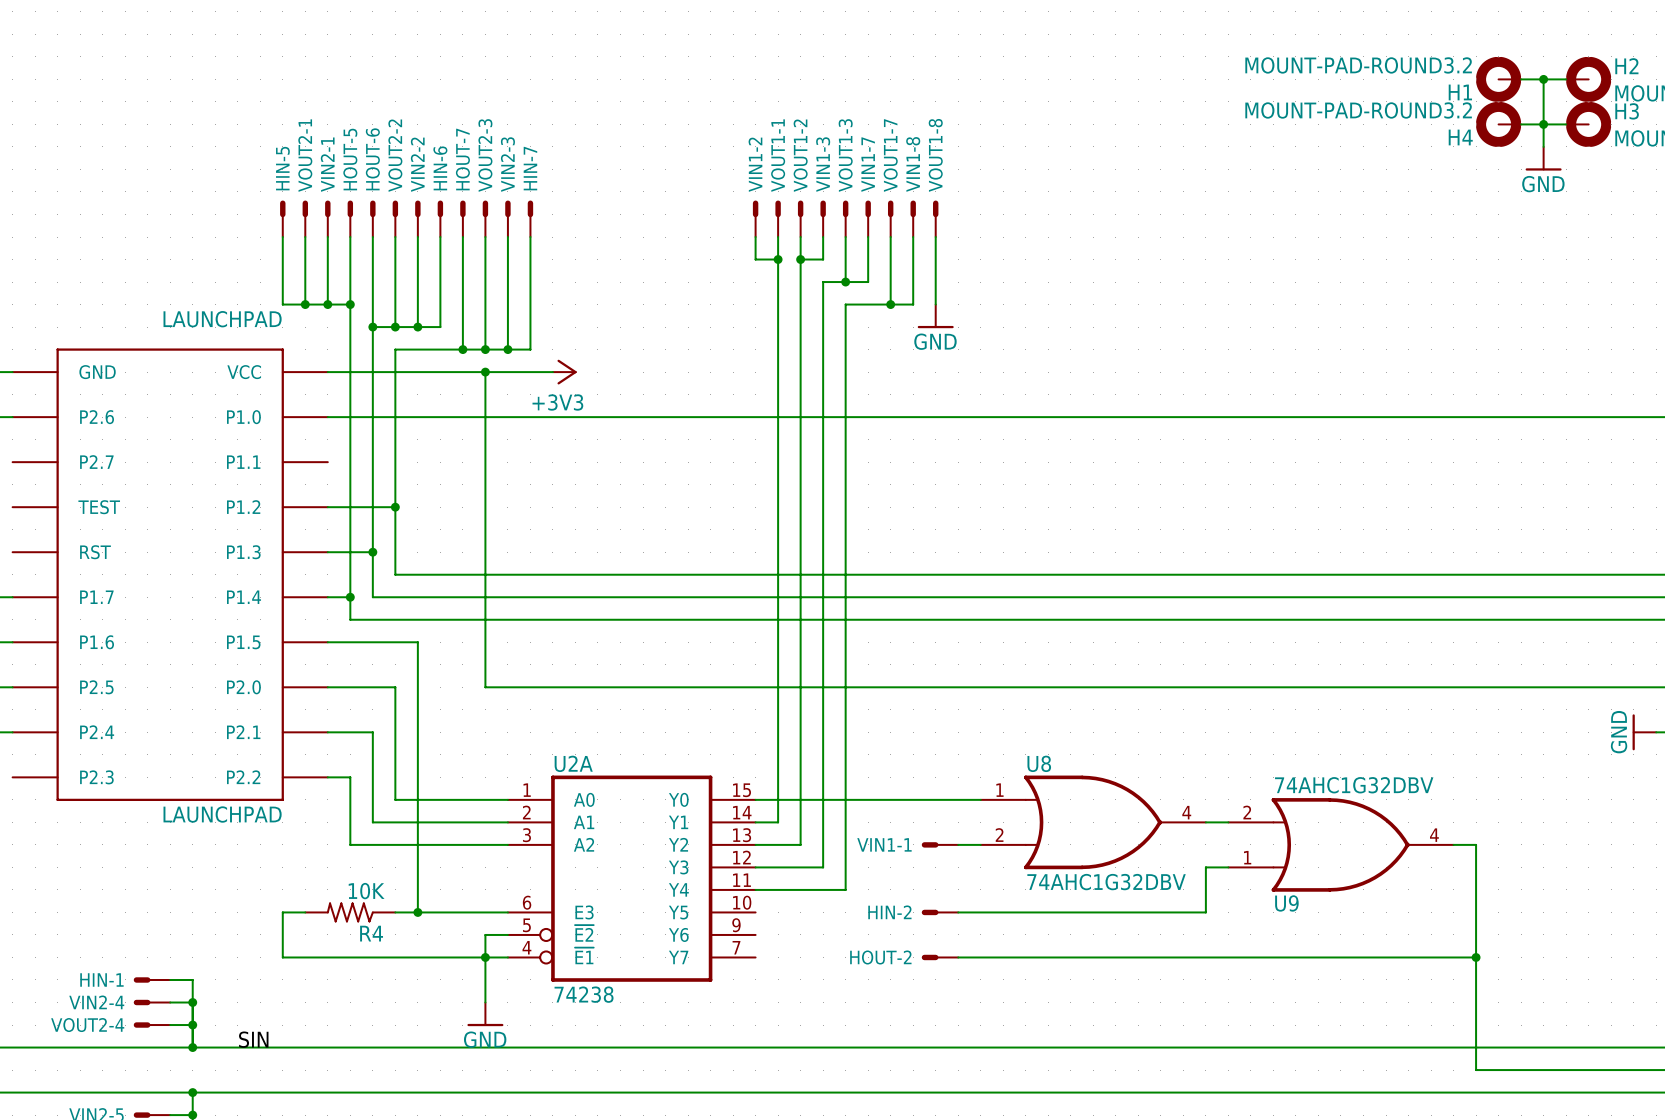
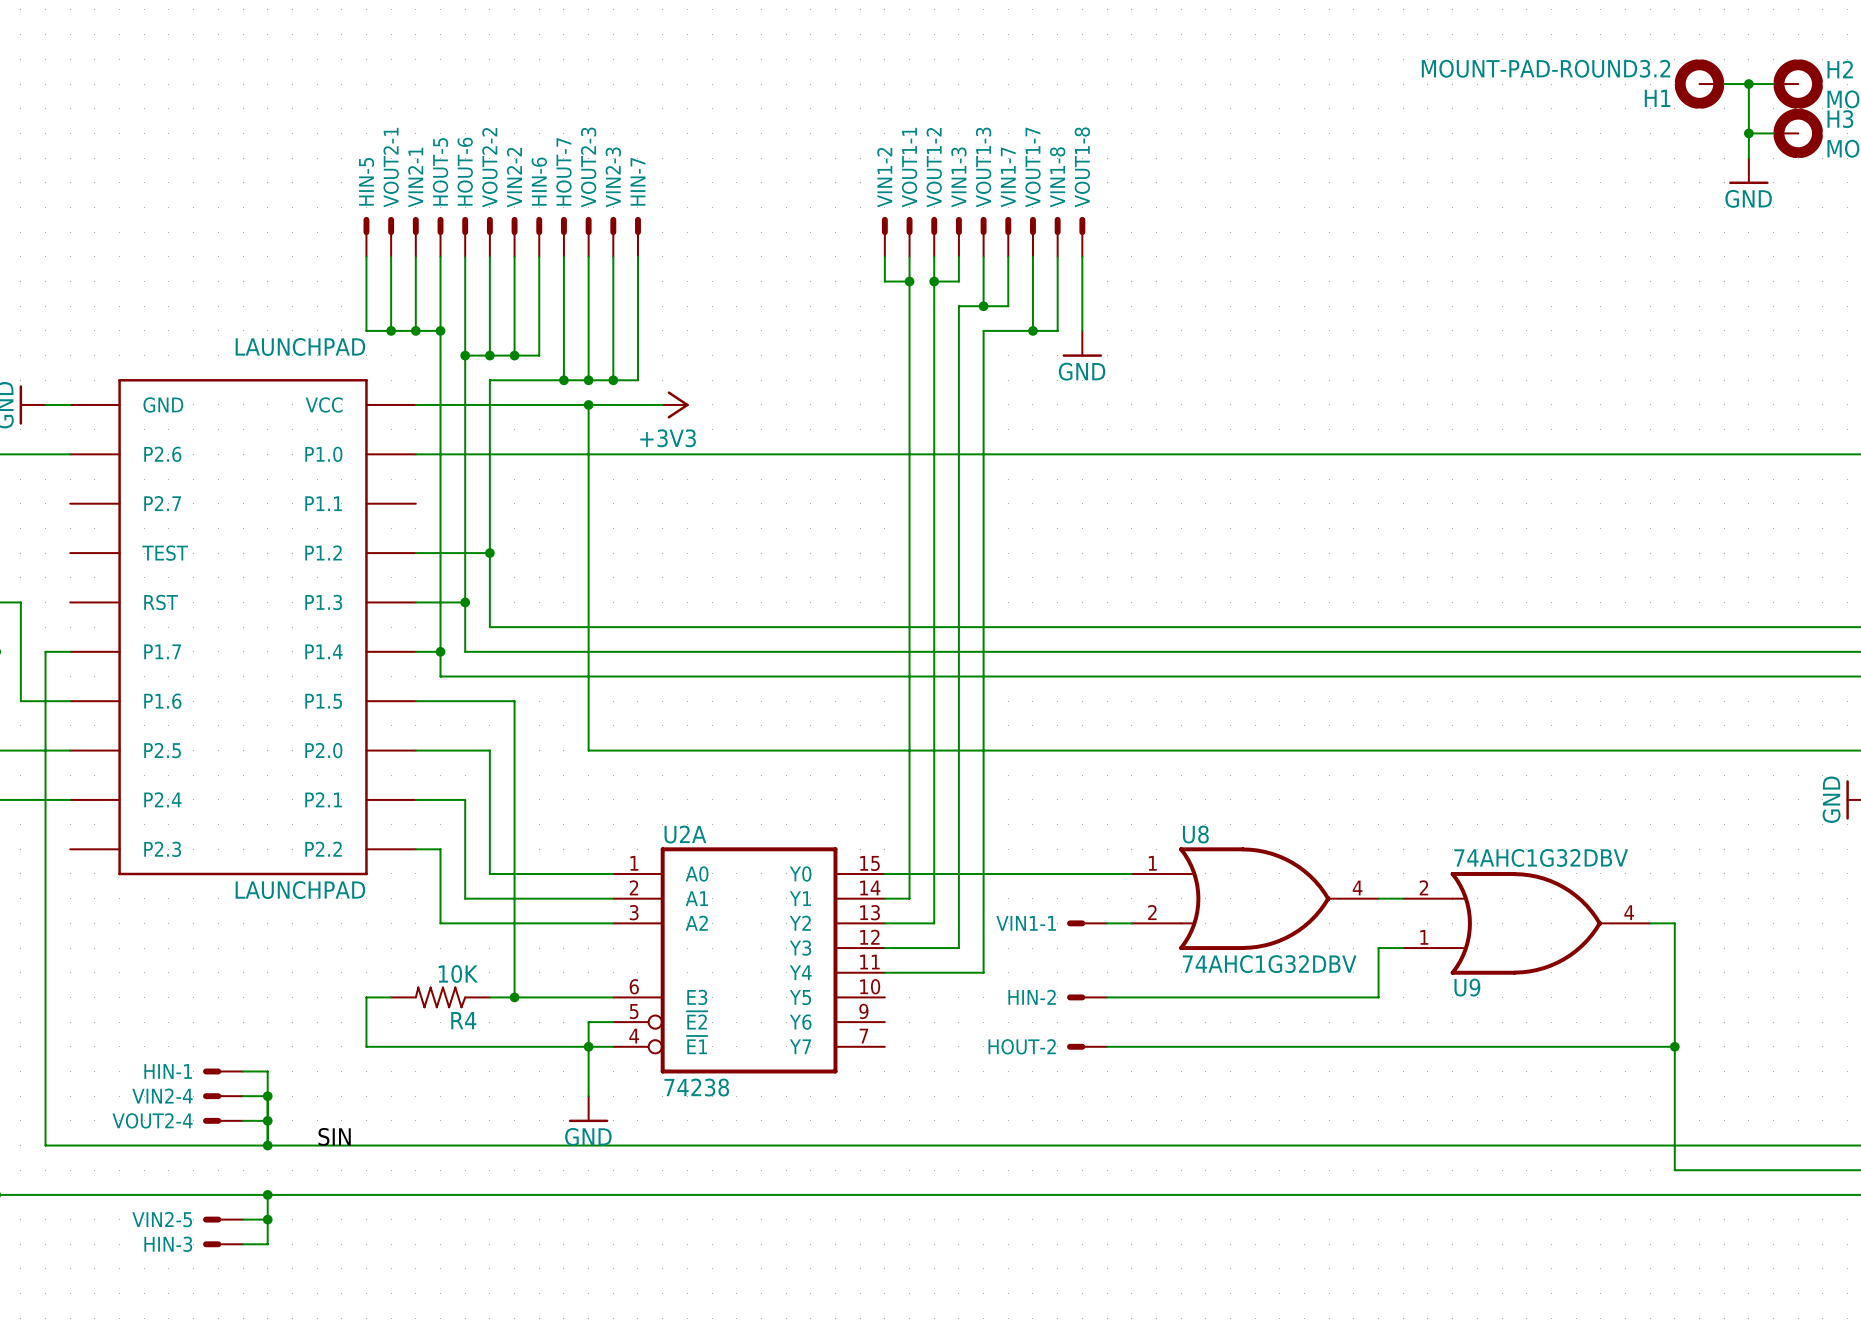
H4: MOUNT-PAD-ROUND3.2 (1498, 124) -> none
wire: (1521, 124) (1543, 124) -> none

